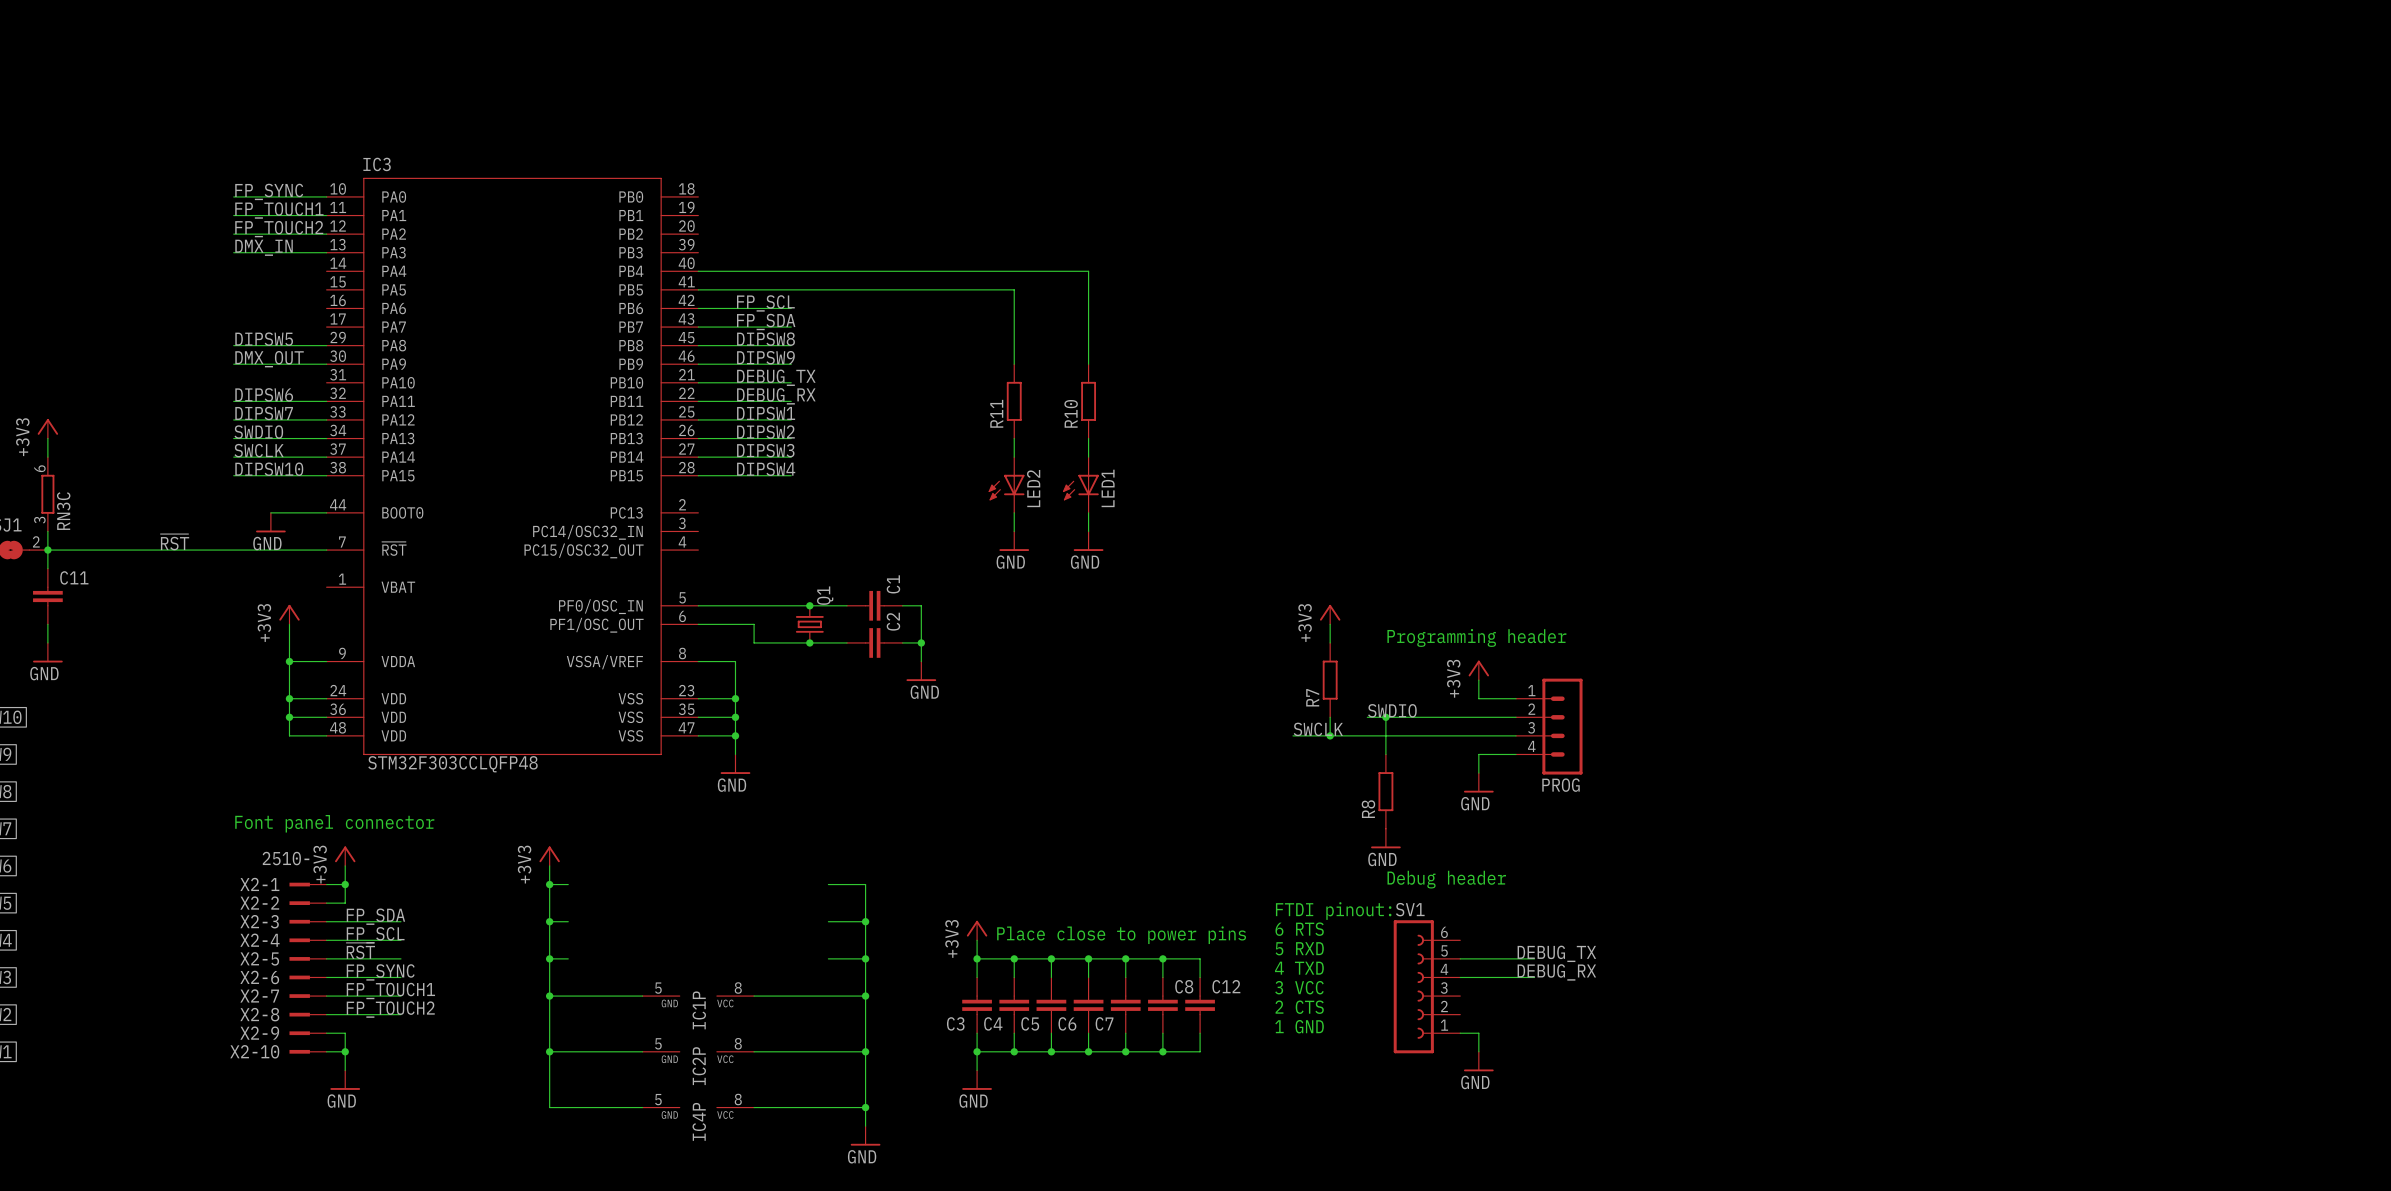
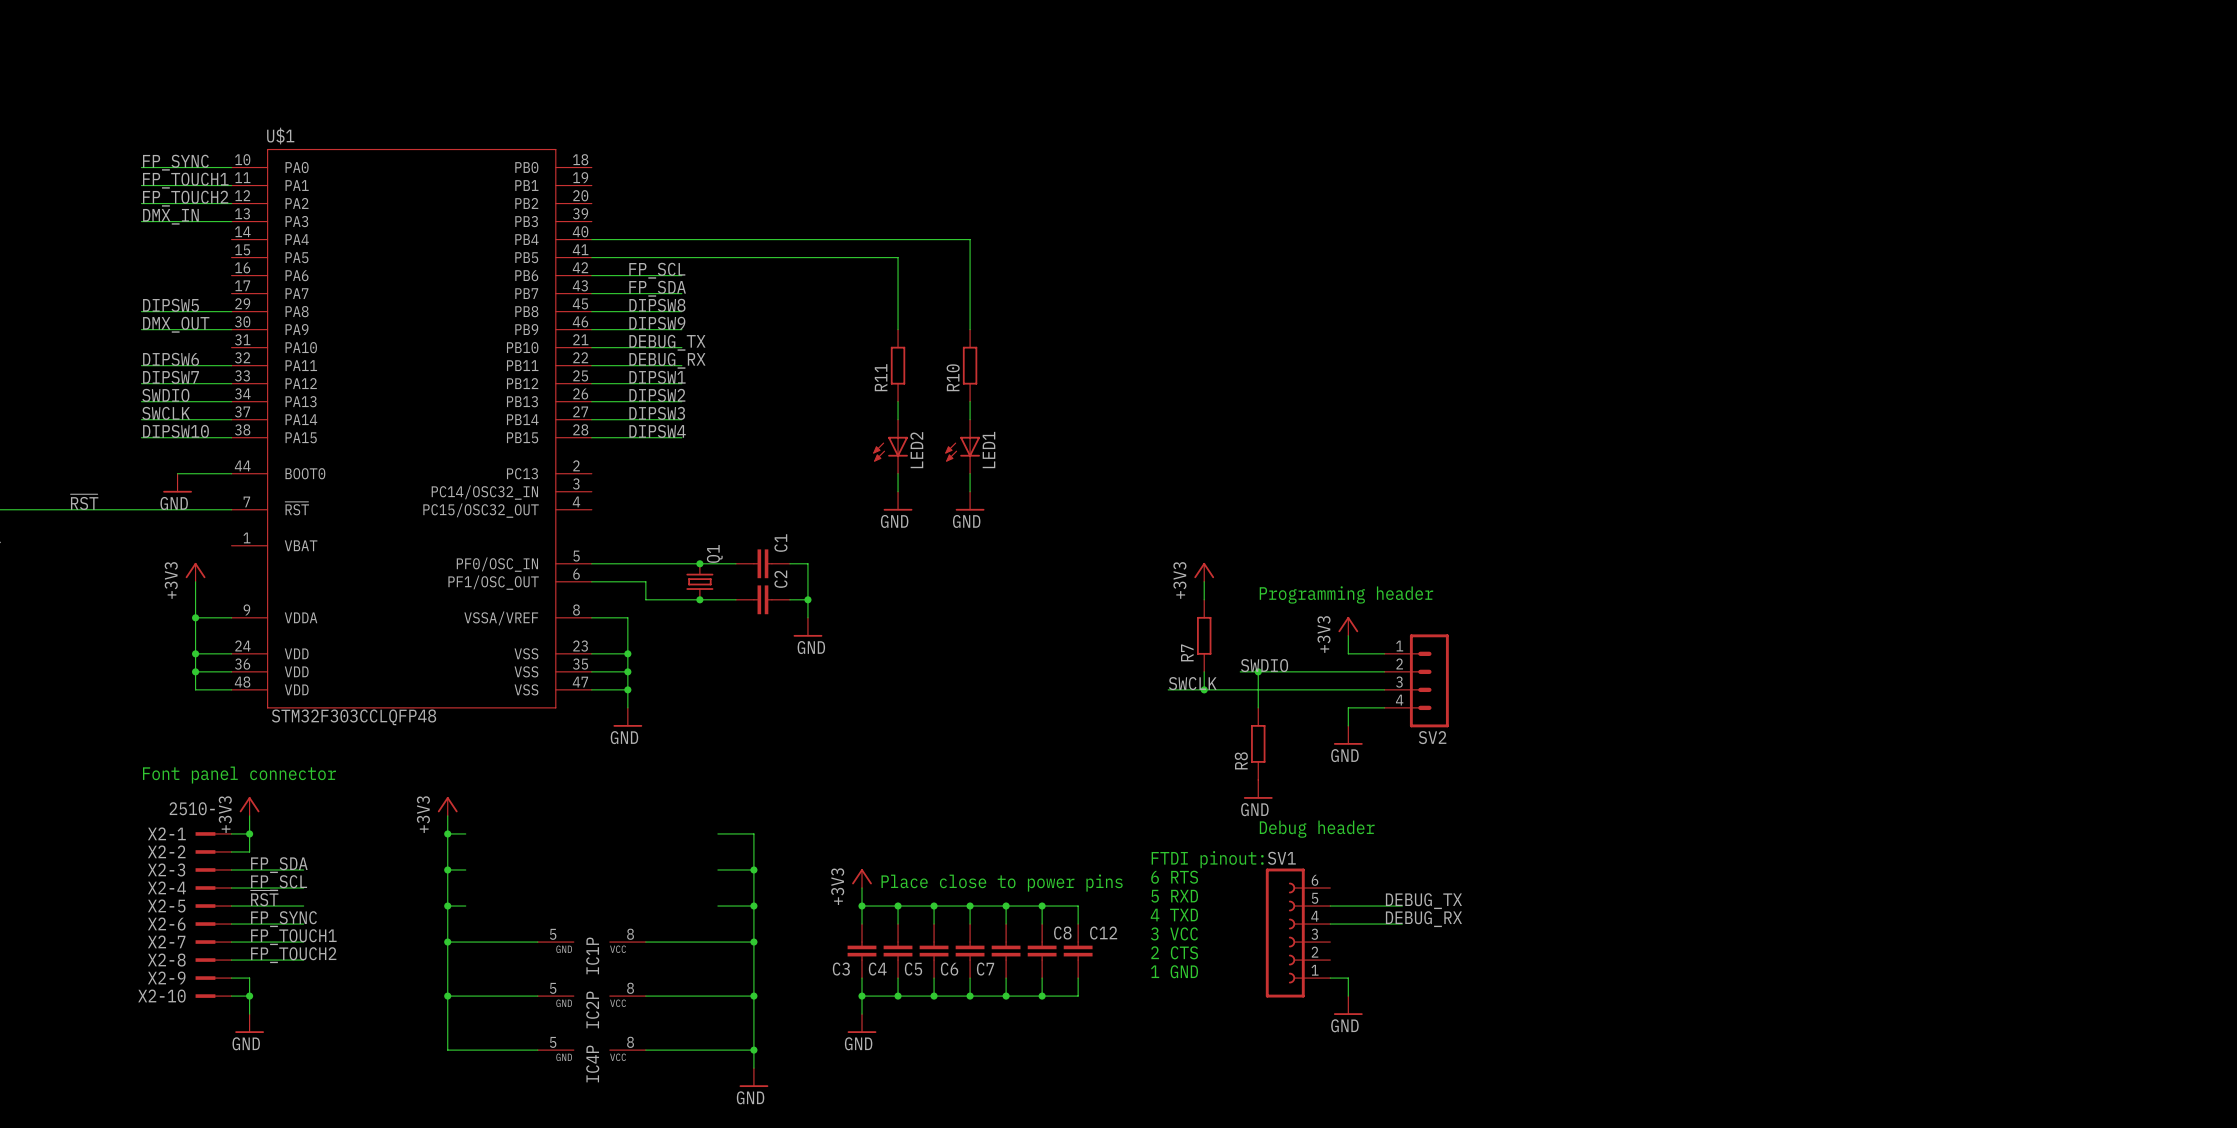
IC3 name: IC3 (377, 164) -> U$1 (280, 136)
PROG name: PROG (1561, 785) -> SV2 (1432, 737)

